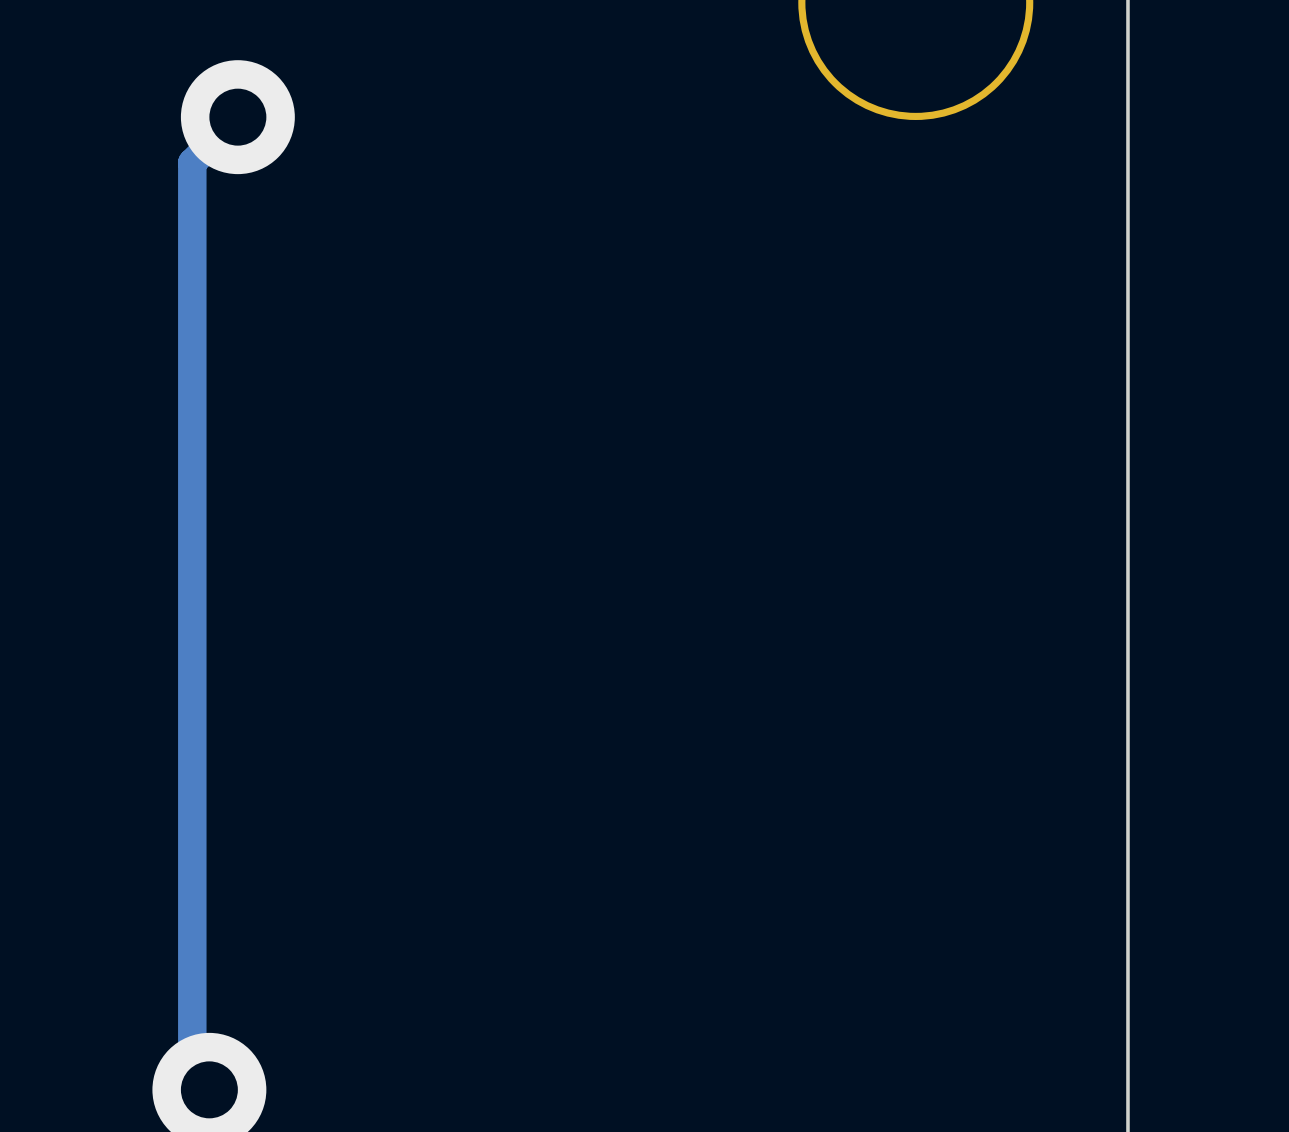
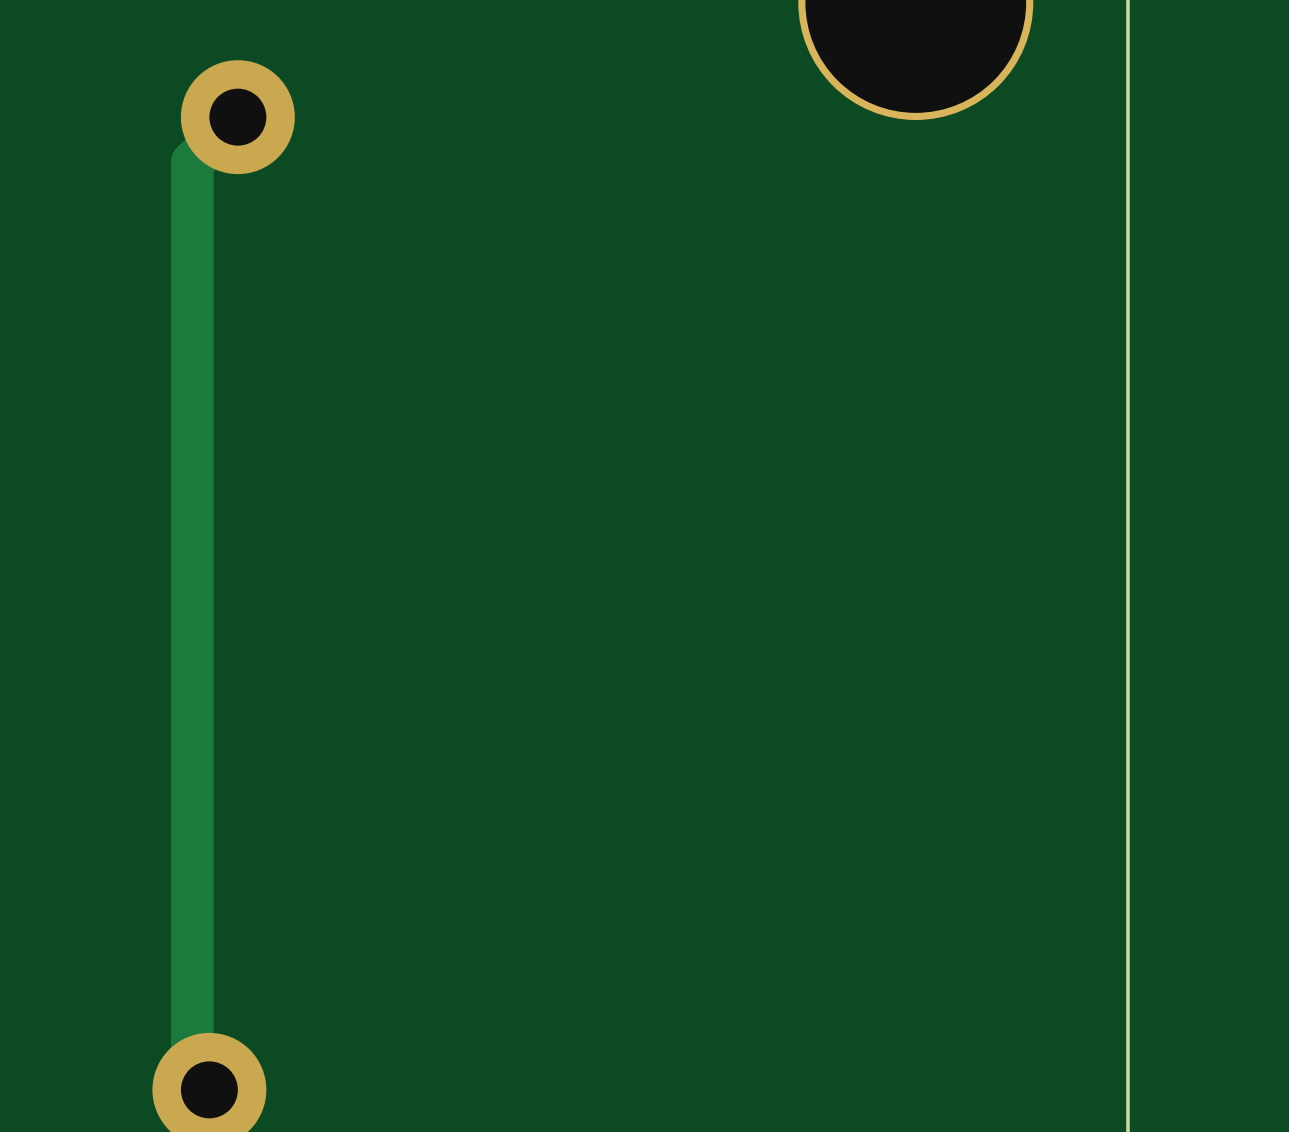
track width: thin (237, 117) (192, 162) (192, 1072) (209, 1089) -> thick (237, 117) (192, 162) (192, 1072) (209, 1089)

